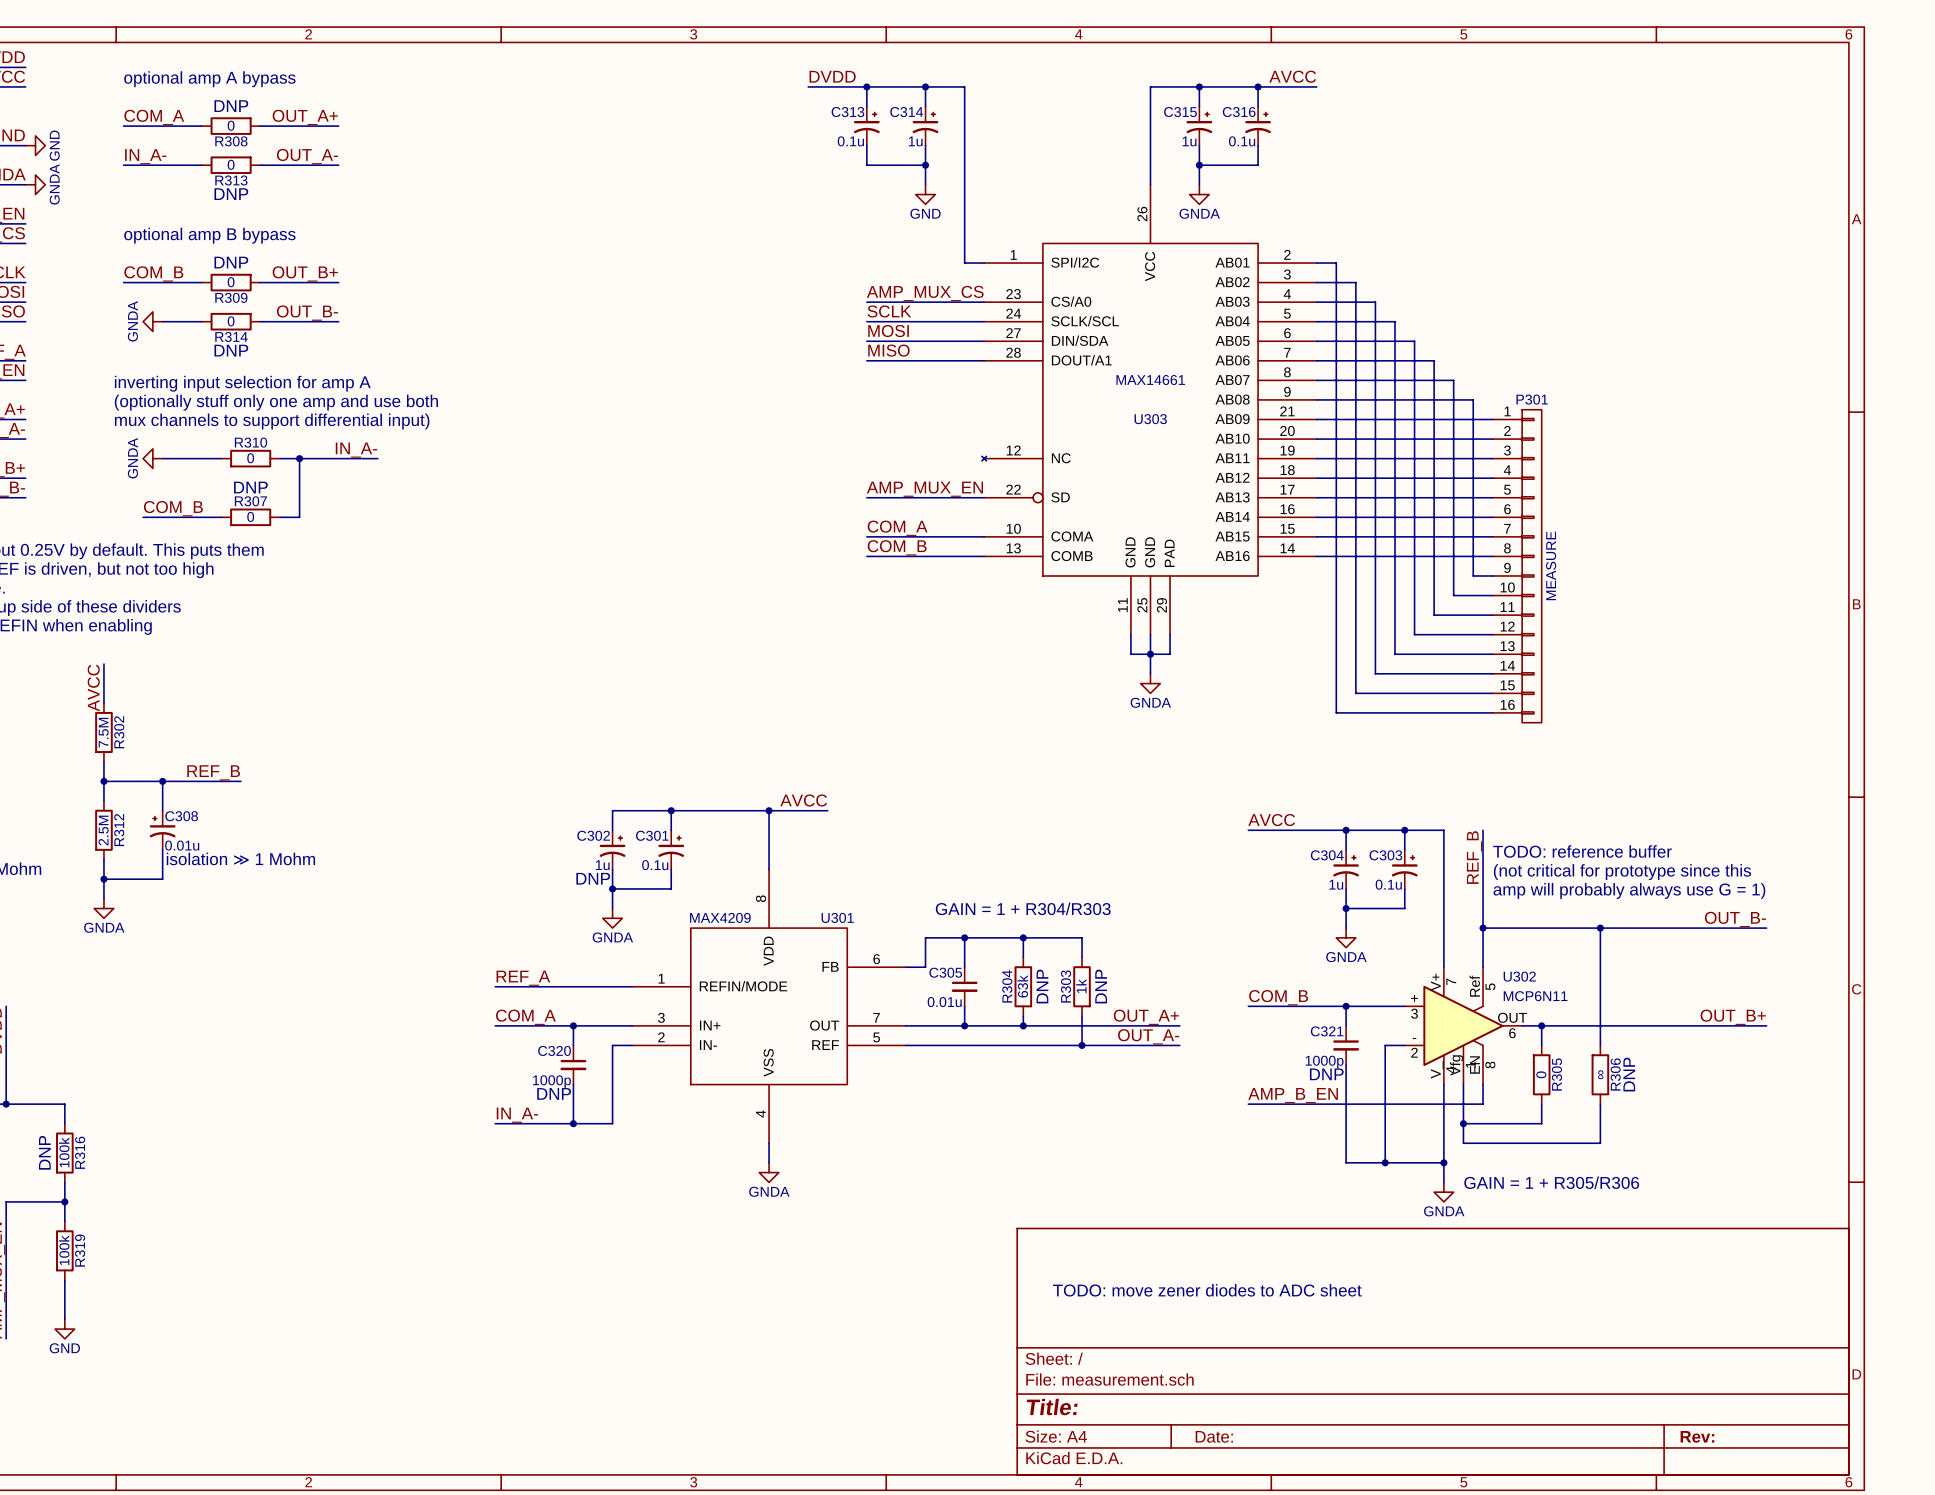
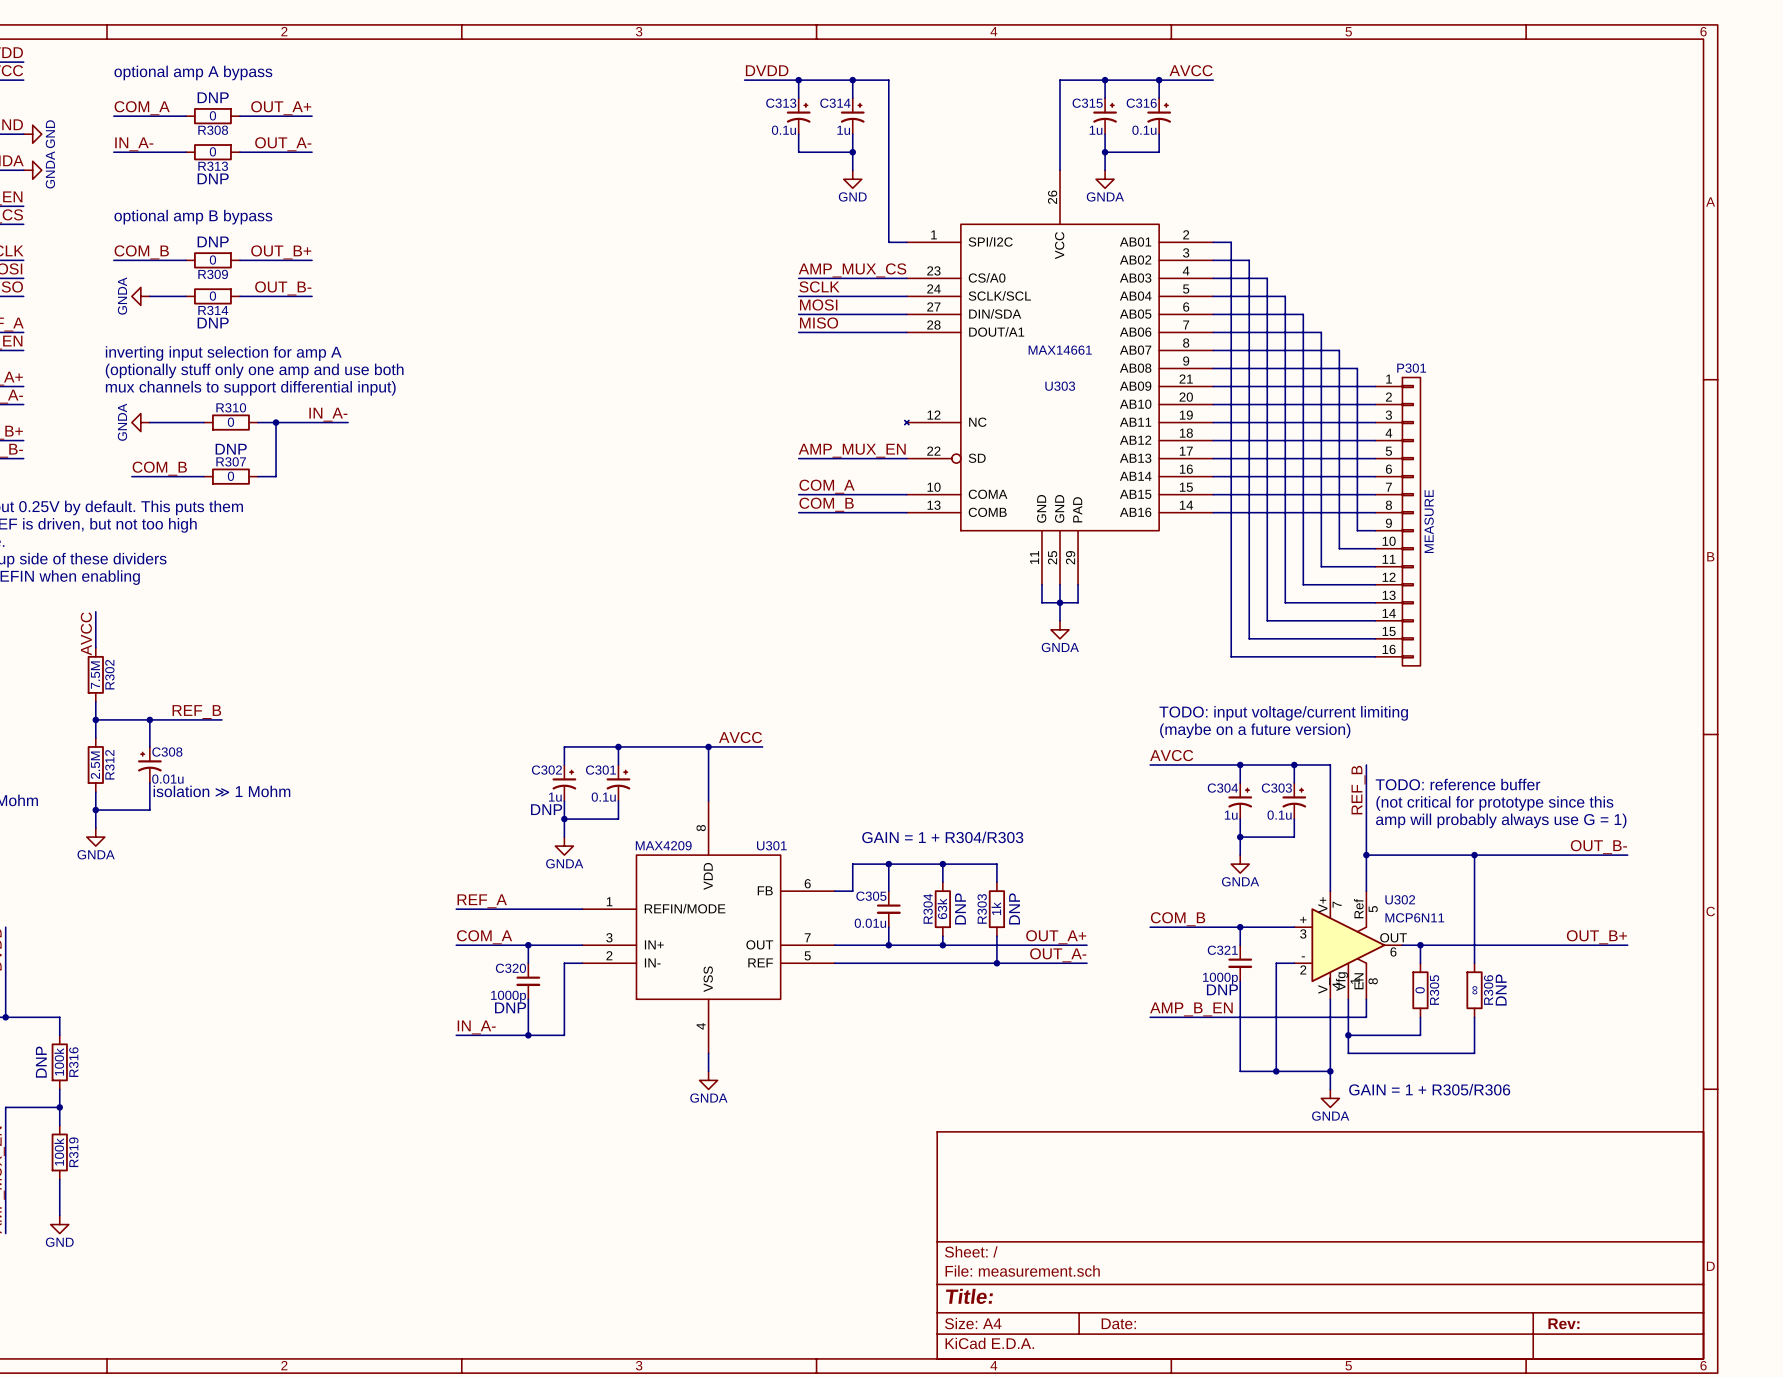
text: none -> TODO: input voltage/current limiting (1283, 713)
text: none -> (maybe on a future version) (1255, 730)
text: TODO: move zener diodes to ADC sheet (1207, 1290) -> none

